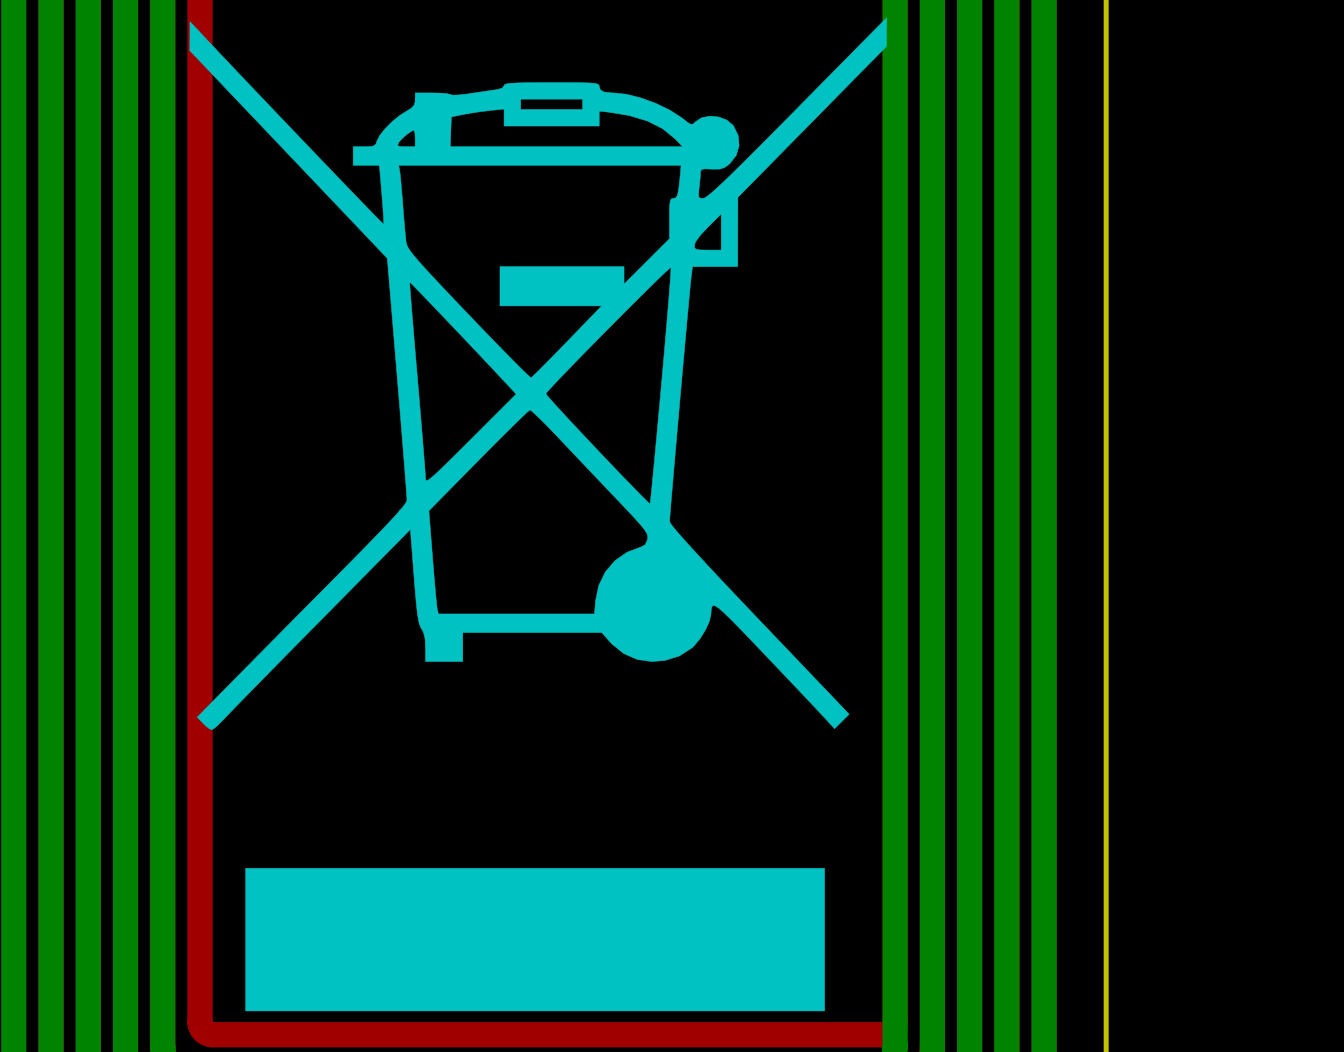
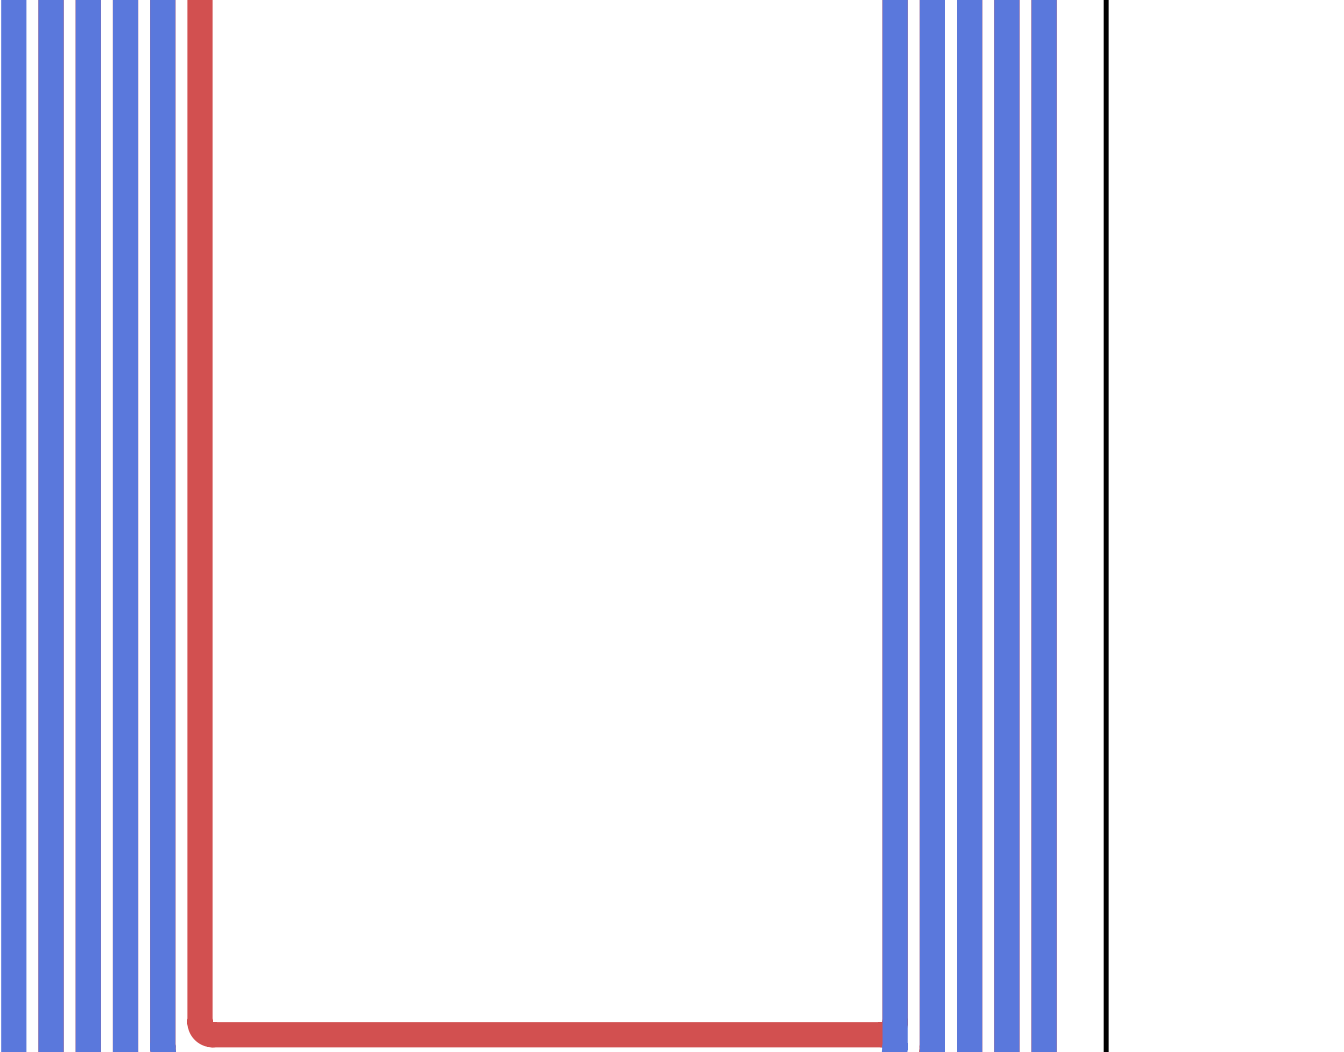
drawing: [189, 17, 887, 1012] -> none

